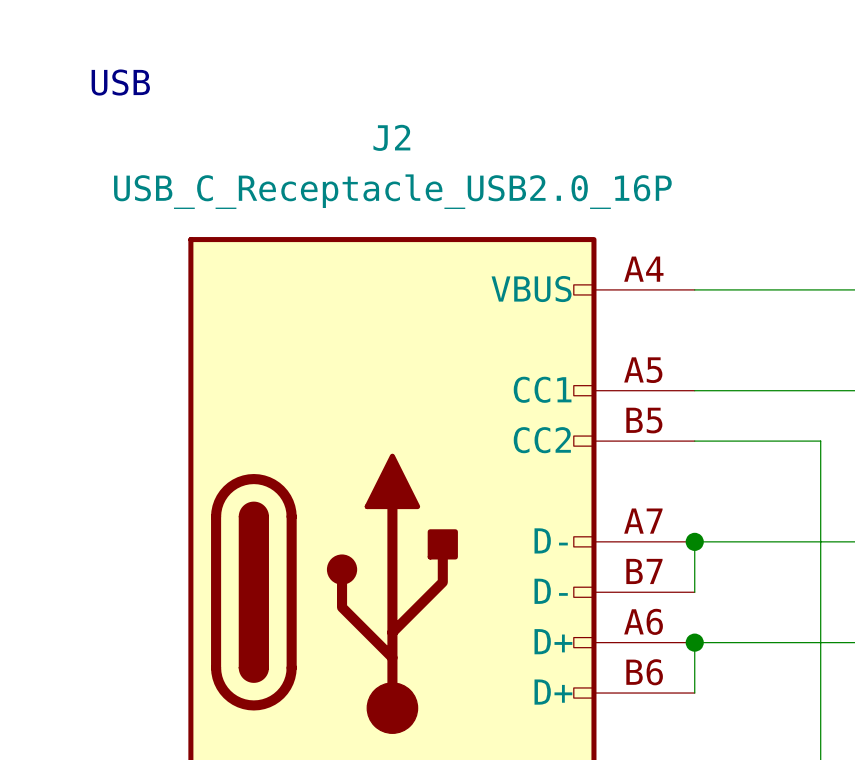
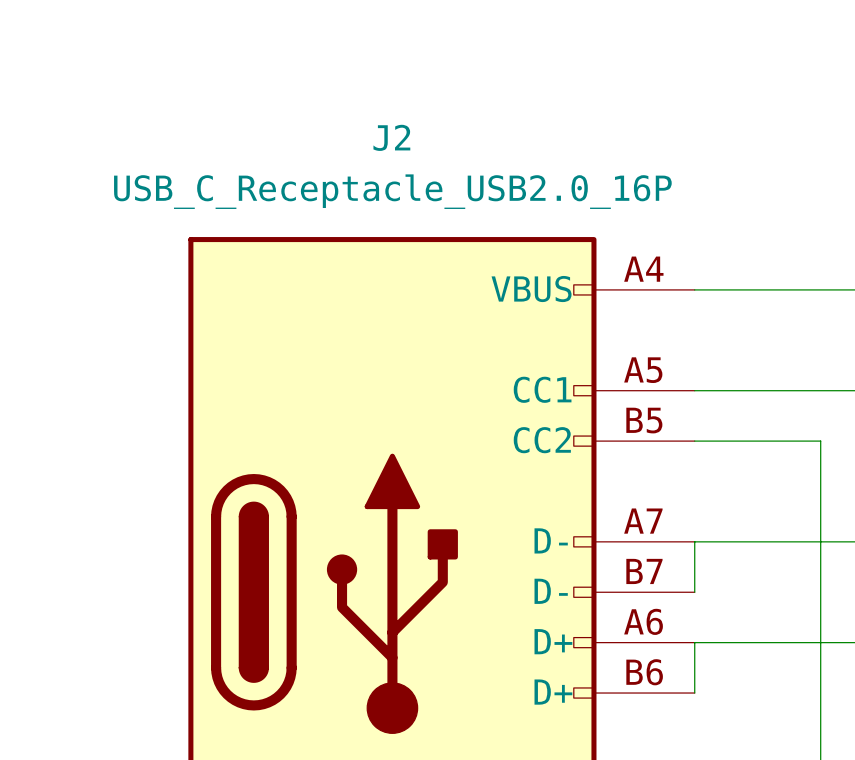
text: USB (120, 82) -> none
junction: (694, 541) -> none
junction: (694, 642) -> none

